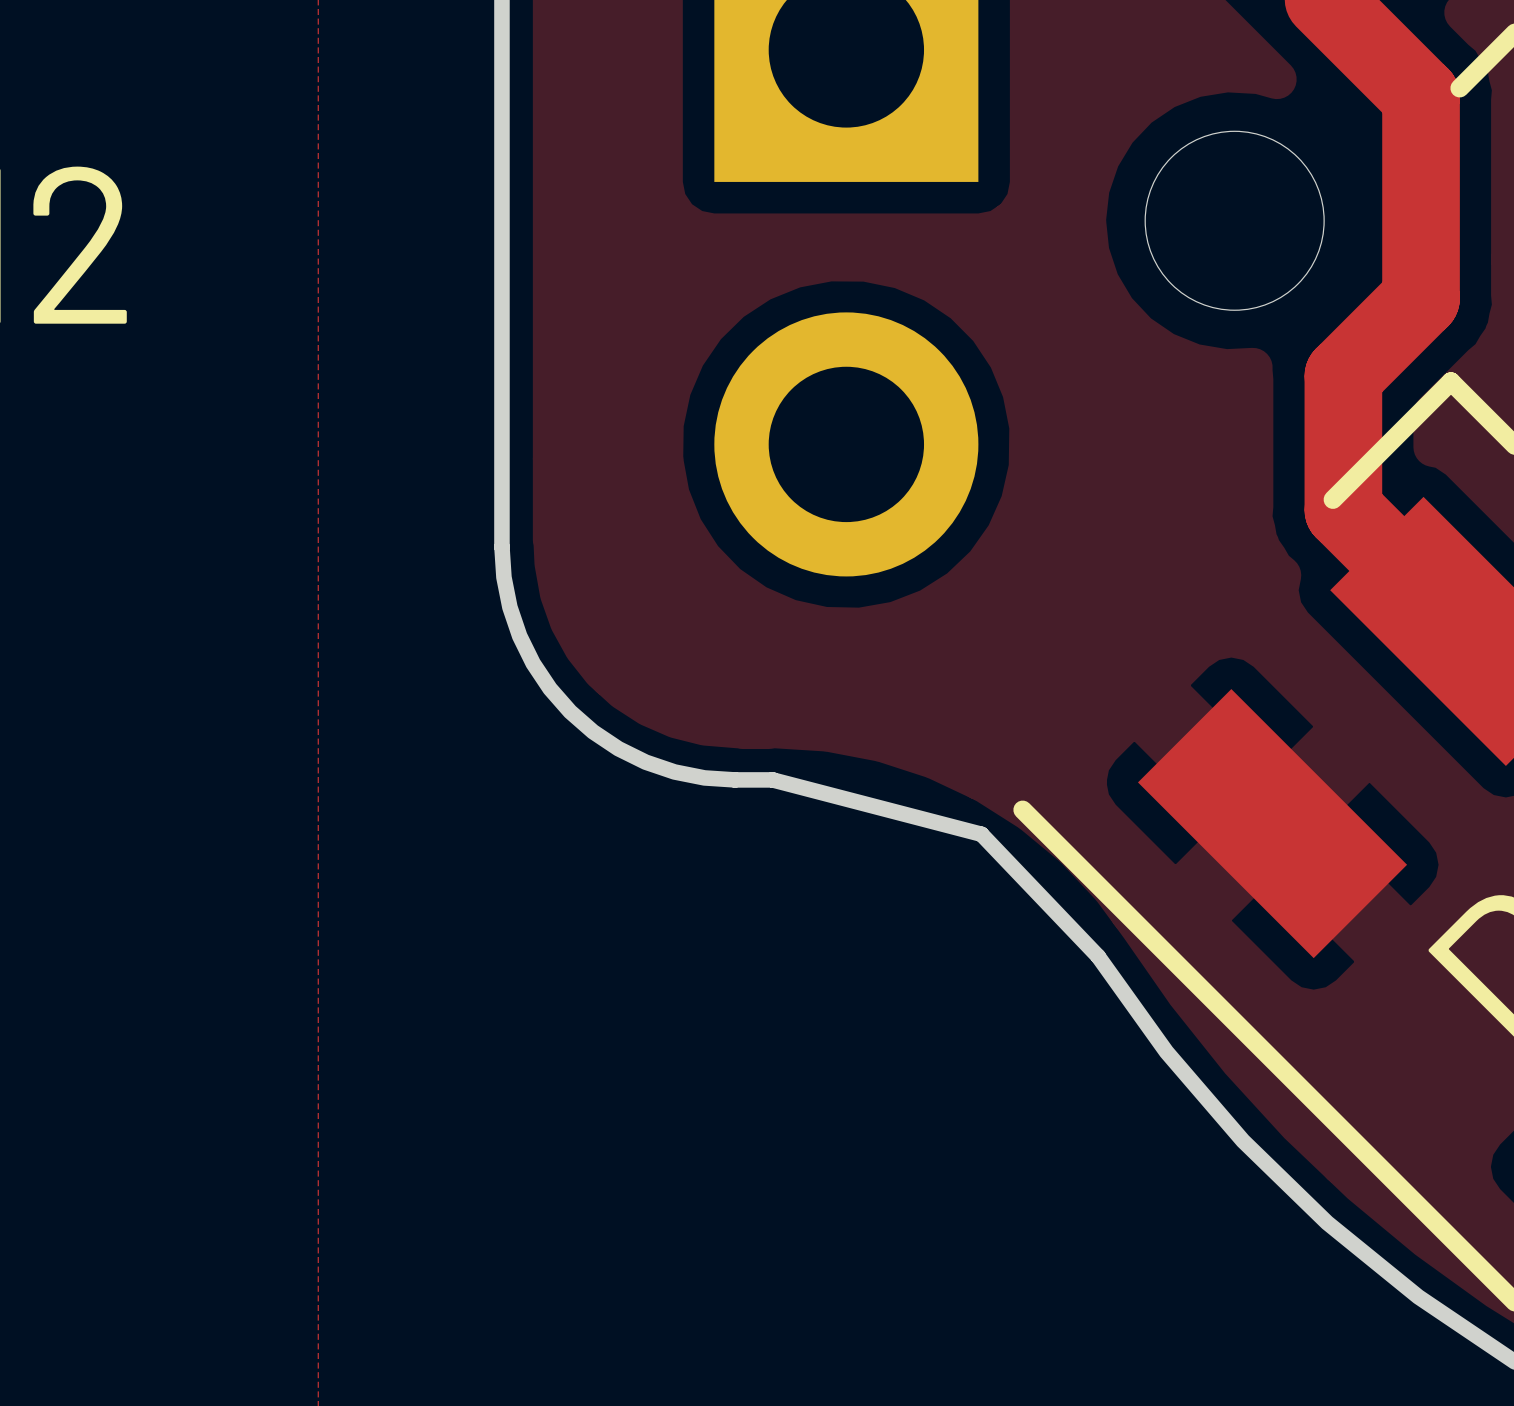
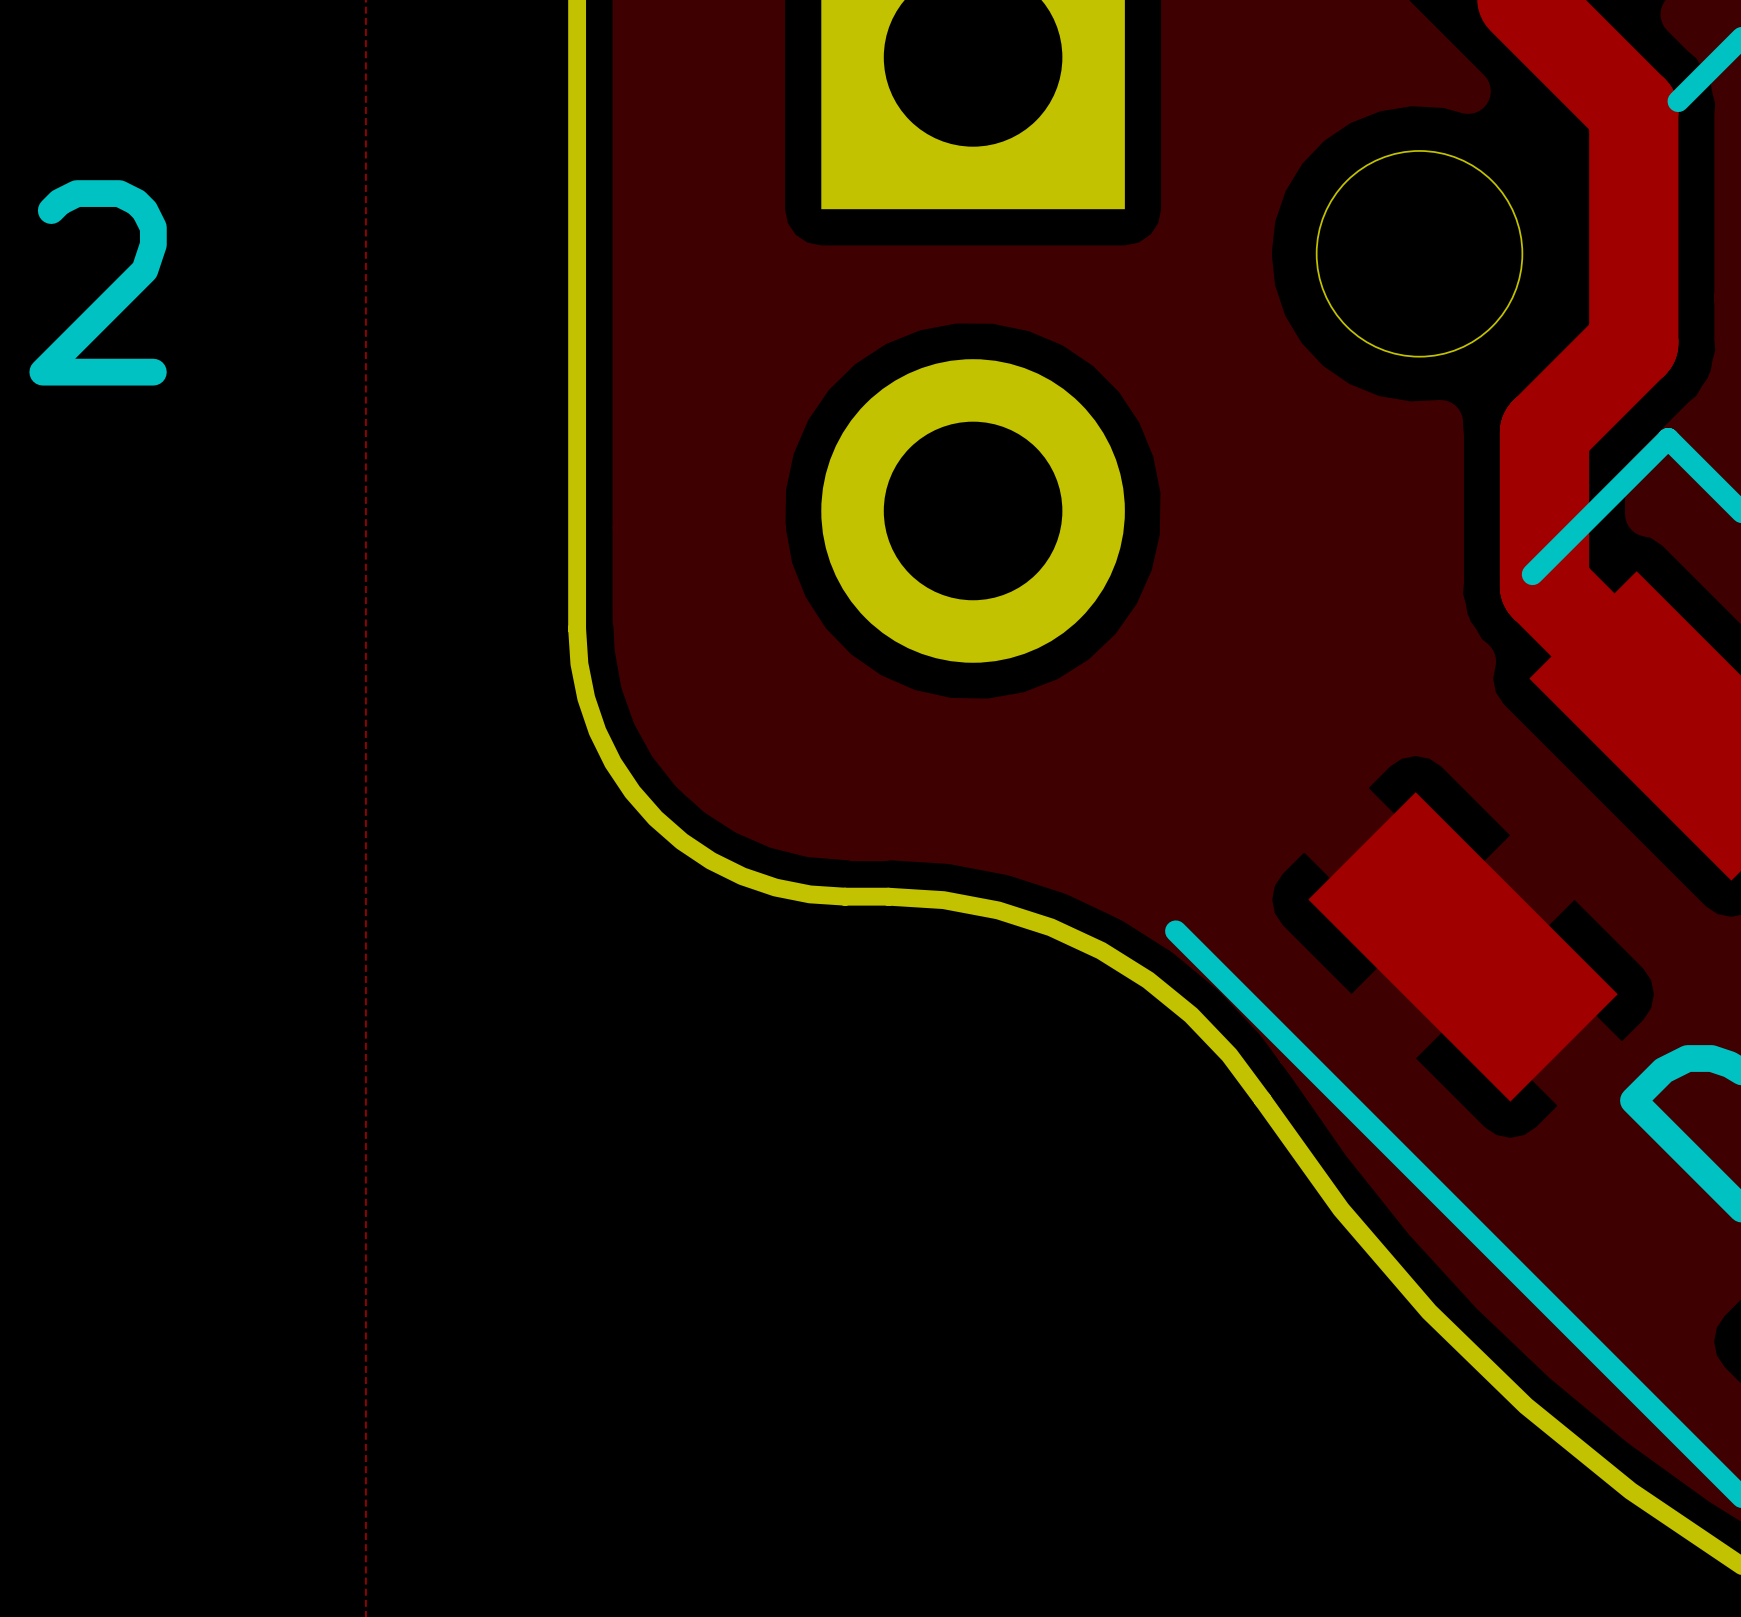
board edge: (772, 779) (981, 834) (1098, 956) -> (888, 896) (943, 900) (998, 910) (1050, 927) (1101, 950) (1148, 980) (1191, 1015) (1229, 1055) (1262, 1099)

